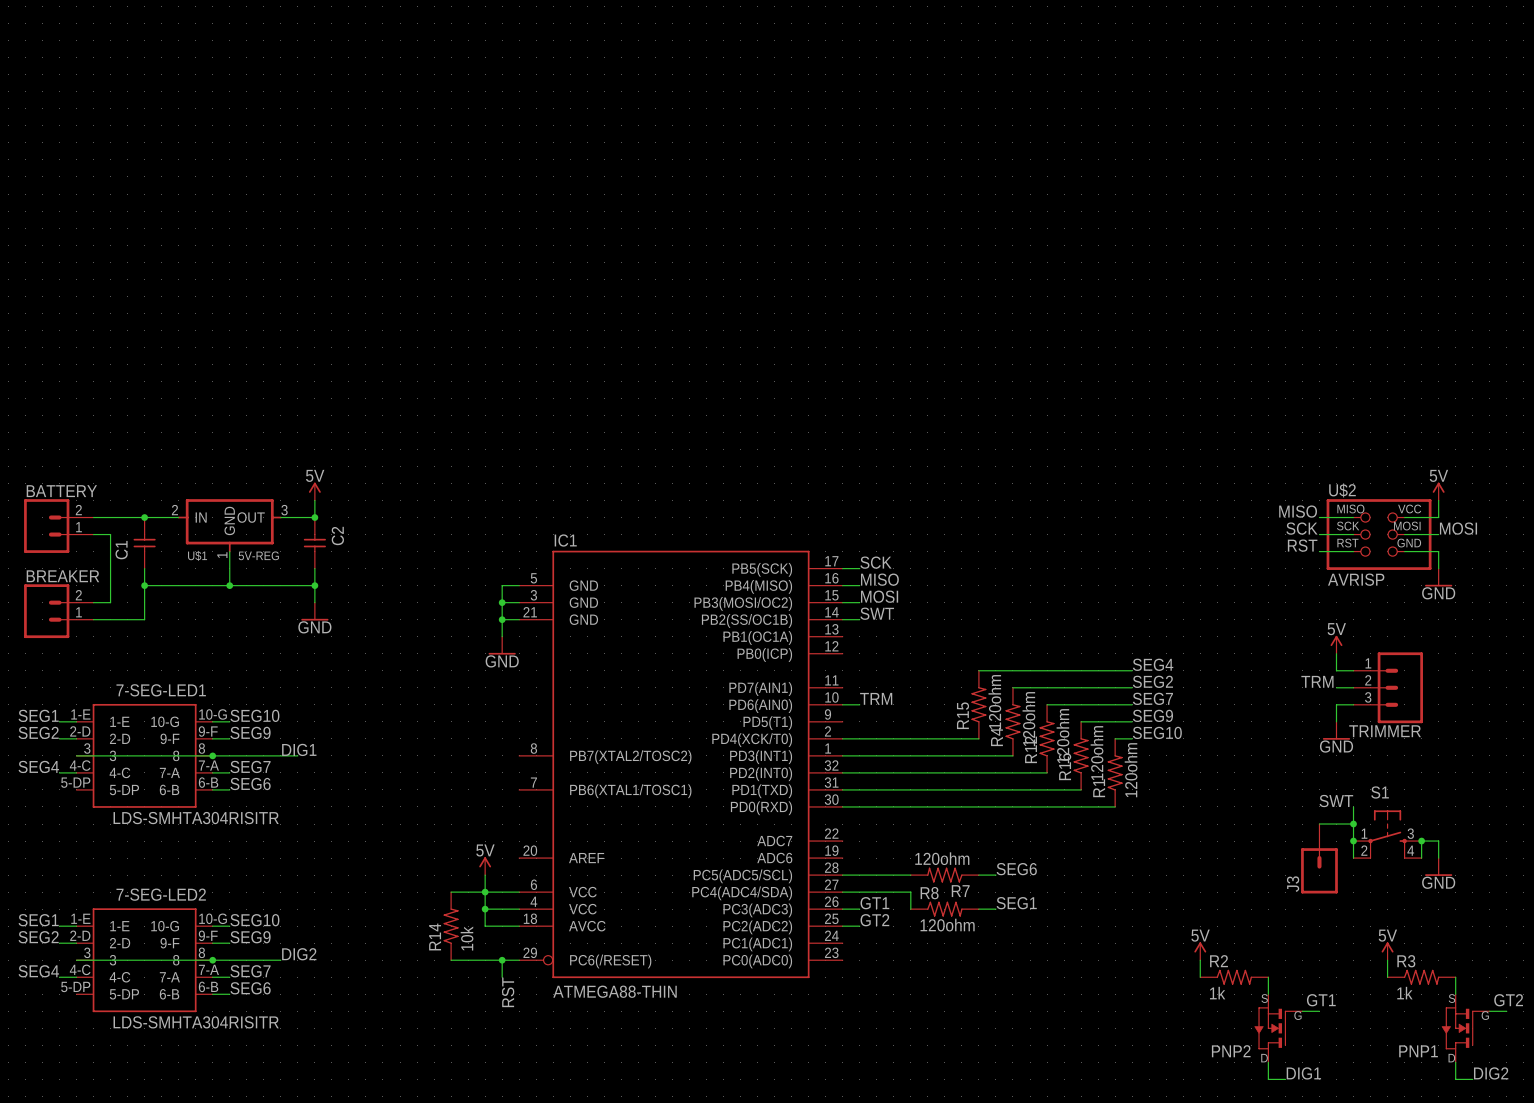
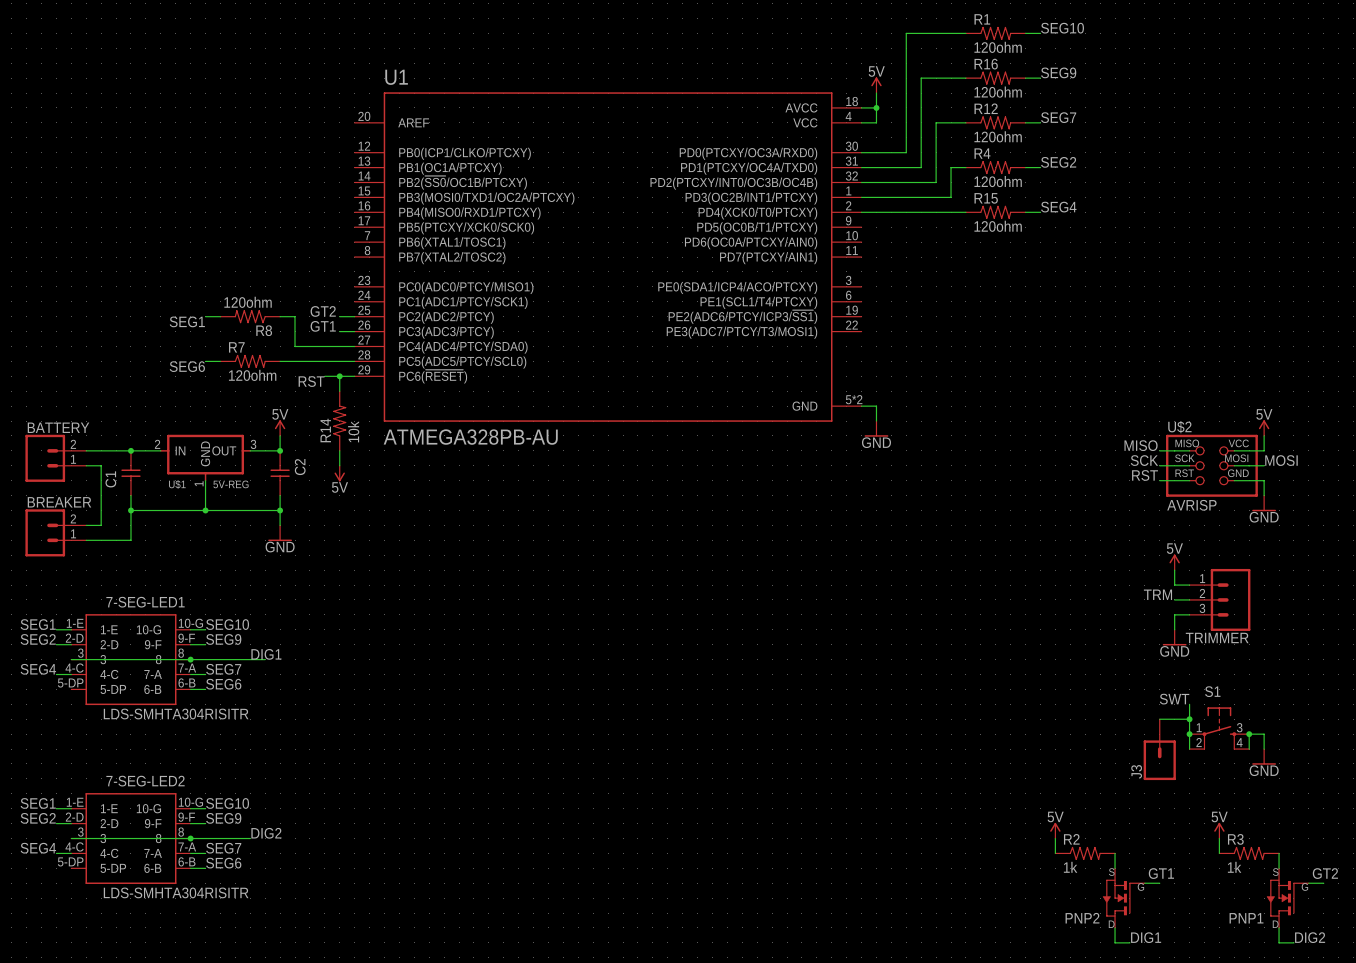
label: none -> SEG10 (1062, 28)
wire: none -> (965, 33) (906, 33) (906, 152) (861, 152)
wire: none -> (1025, 33) (1040, 33)
label: none -> SEG9 (1058, 72)
wire: none -> (965, 78) (921, 78) (921, 167) (861, 167)
wire: none -> (1025, 78) (1040, 78)
power symbol: none -> 5V (876, 85)
wire: none -> (876, 93) (876, 122) (861, 122)
wire: none -> (861, 107) (876, 107)
junction: none -> (876, 107)
label: none -> SEG7 (1058, 117)
wire: none -> (965, 122) (936, 122) (936, 182) (861, 182)
wire: none -> (1025, 122) (1040, 122)
label: none -> SEG2 (1058, 162)
wire: none -> (965, 167) (951, 167) (951, 197) (861, 197)
wire: none -> (1025, 167) (1040, 167)
label: none -> SEG4 (1058, 207)
wire: none -> (861, 212) (965, 212)
wire: none -> (1025, 212) (1040, 212)
U1: none -> ATMEGA328PB-AU (608, 257)
label: none -> GT2 (323, 311)
wire: none -> (205, 316) (220, 316)
wire: none -> (280, 316) (295, 316) (295, 346) (354, 346)
wire: none -> (339, 316) (354, 316)
label: none -> SEG1 (187, 321)
label: none -> GT1 (323, 326)
wire: none -> (339, 331) (354, 331)
wire: none -> (205, 361) (220, 361)
wire: none -> (280, 361) (354, 361)
label: none -> SEG6 (187, 366)
wire: none -> (324, 376) (354, 376)
wire: none -> (339, 376) (339, 391)
junction: none -> (339, 376)
label: none -> RST (311, 381)
wire: none -> (861, 406) (876, 406) (876, 421)
power symbol: none -> GND (876, 428)
wire: none -> (339, 450) (339, 465)
power symbol: none -> 5V (339, 473)
label: SCK (876, 562) -> none
wire: (842, 568) (859, 568) -> none
label: MISO (879, 579) -> none
wire: (519, 585) (502, 585) (502, 636) -> none
wire: (842, 585) (859, 585) -> none
label: MOSI (879, 596) -> none
wire: (502, 602) (519, 602) -> none
junction: (502, 602) -> none
wire: (842, 602) (859, 602) -> none
label: SWT (877, 613) -> none
wire: (502, 619) (519, 619) -> none
junction: (502, 619) -> none
wire: (842, 619) (859, 619) -> none
power symbol: GND (502, 645) -> none
label: SEG4 (1153, 664) -> none
wire: (978, 670) (1132, 670) -> none
label: SEG2 (1152, 681) -> none
wire: (1012, 687) (1132, 687) -> none
label: TRM (876, 698) -> none
label: SEG7 (1152, 698) -> none
wire: (842, 704) (859, 704) -> none
R15 rotation: 0° (978, 704) -> 90° clockwise (995, 212)
R15 position: (978, 704) -> (995, 212)
wire: (1047, 704) (1132, 704) -> none
label: SEG9 (1152, 715) -> none
R4 rotation: 0° (1012, 721) -> 90° clockwise (995, 167)
R4 position: (1012, 721) -> (995, 167)
wire: (1081, 721) (1132, 721) -> none
label: SEG10 (1157, 732) -> none
wire: (842, 738) (978, 738) -> none
R12 rotation: 0° (1047, 738) -> 90° clockwise (995, 122)
R12 position: (1047, 738) -> (995, 122)
wire: (1115, 738) (1132, 738) -> none
wire: (842, 755) (1012, 755) -> none
R16 rotation: 0° (1081, 755) -> 90° clockwise (995, 78)
R16 position: (1081, 755) -> (995, 78)
IC1: ATMEGA88-THIN (680, 764) -> none
wire: (842, 772) (1047, 772) -> none
R1 rotation: 0° (1115, 772) -> 90° clockwise (995, 33)
R1 position: (1115, 772) -> (995, 33)
wire: (842, 789) (1081, 789) -> none
wire: (842, 806) (1115, 806) -> none
power symbol: 5V (485, 866) -> none
label: SEG6 (1016, 869) -> none
wire: (485, 875) (485, 926) (519, 926) -> none
wire: (842, 875) (910, 875) -> none
R7 rotation: 0° (944, 875) -> 180° (250, 361)
R7 position: (944, 875) -> (250, 361)
wire: (978, 875) (995, 875) -> none
wire: (451, 892) (519, 892) -> none
junction: (485, 892) -> none
wire: (842, 892) (910, 892) (910, 909) -> none
label: GT1 (874, 903) -> none
label: SEG1 (1016, 903) -> none
wire: (485, 909) (519, 909) -> none
junction: (485, 909) -> none
wire: (842, 909) (859, 909) -> none
R8 rotation: 0° (944, 909) -> 180° (250, 316)
R8 position: (944, 909) -> (250, 316)
wire: (978, 909) (995, 909) -> none
label: GT2 (874, 920) -> none
R14 position: (451, 926) -> (339, 421)
wire: (842, 926) (859, 926) -> none
wire: (451, 960) (519, 960) -> none
wire: (502, 960) (502, 977) -> none
junction: (502, 960) -> none
label: RST (508, 992) -> none

